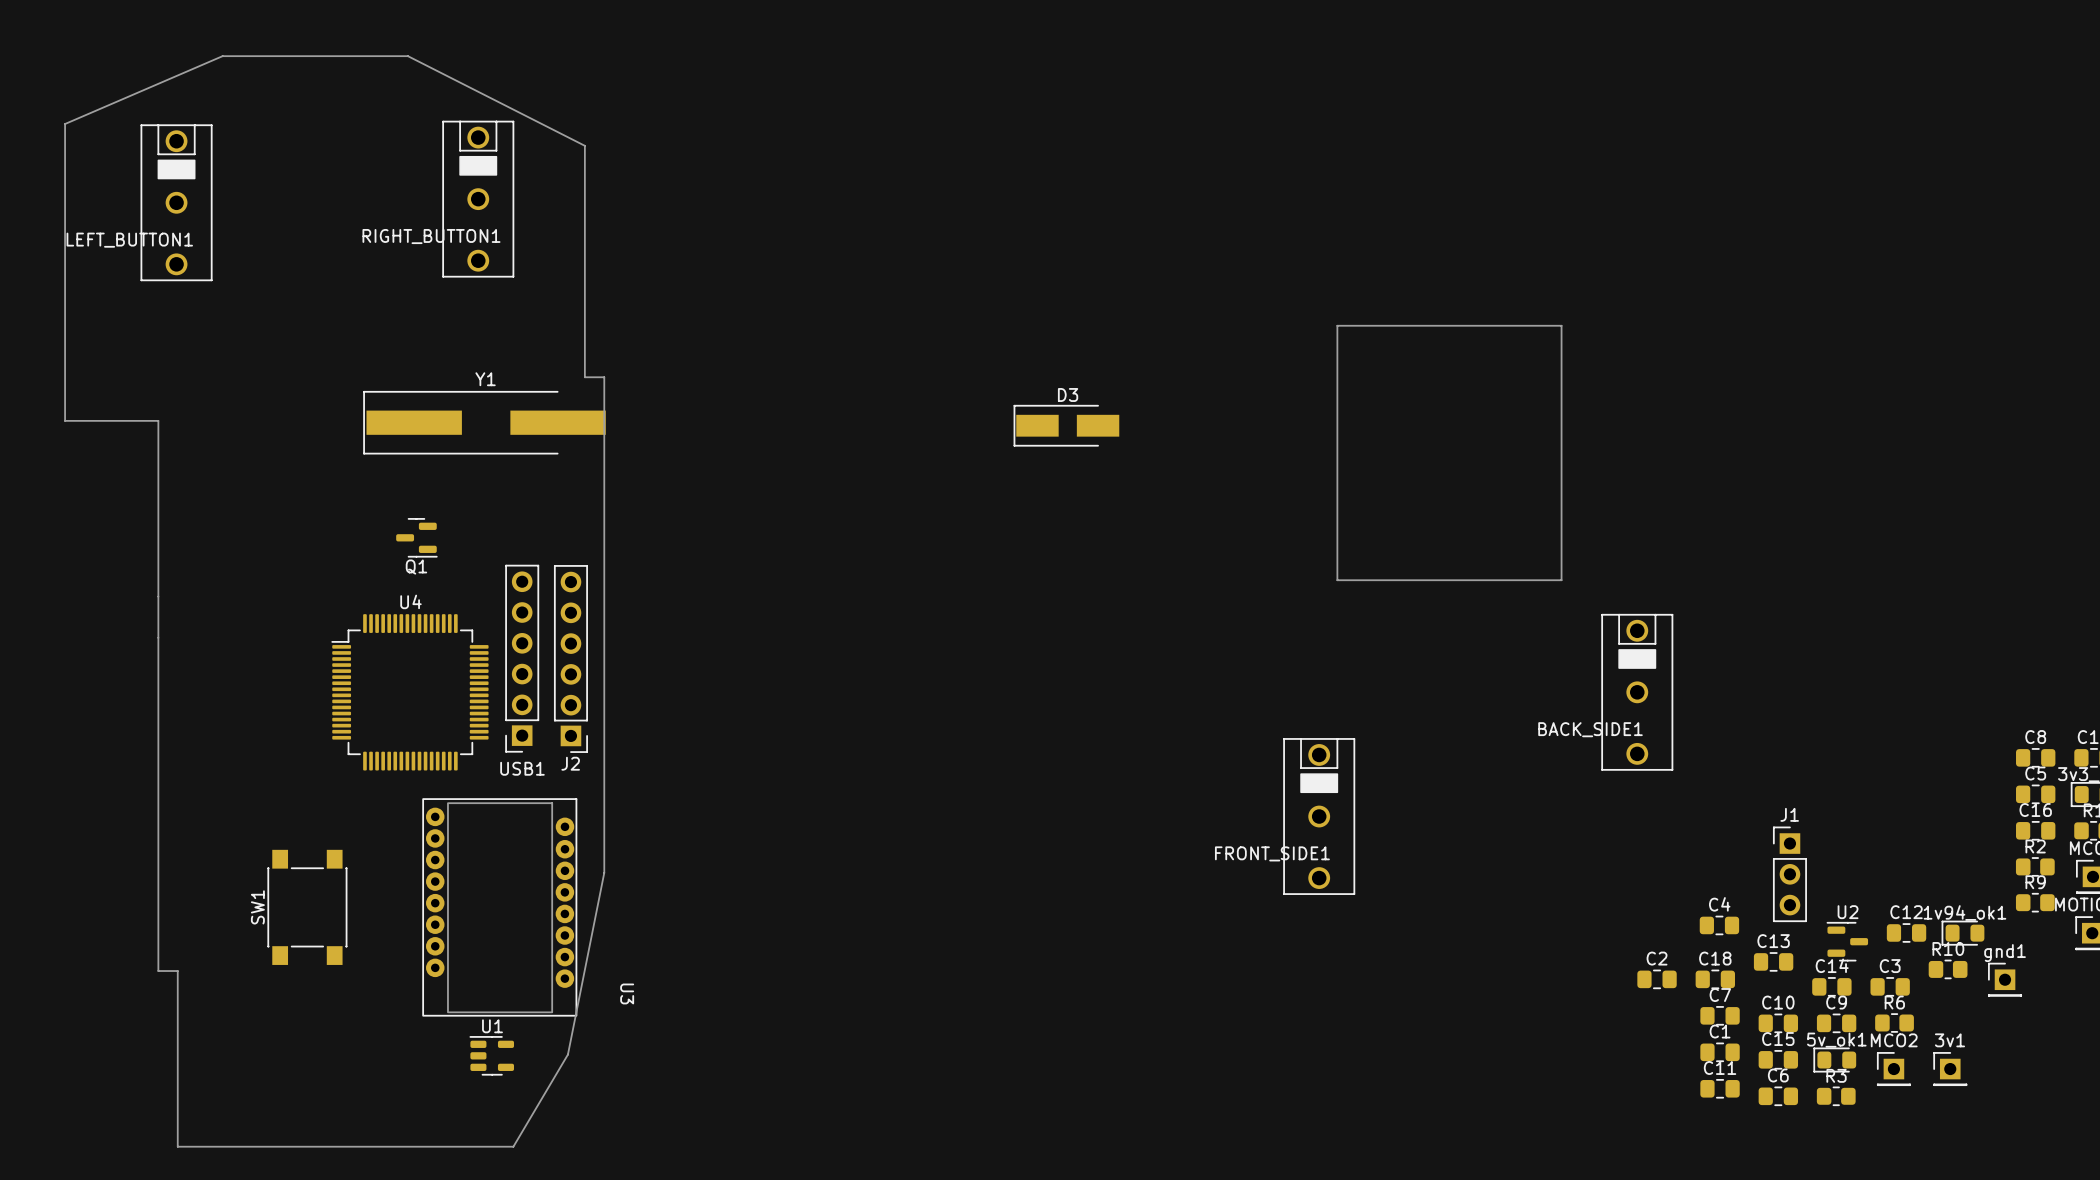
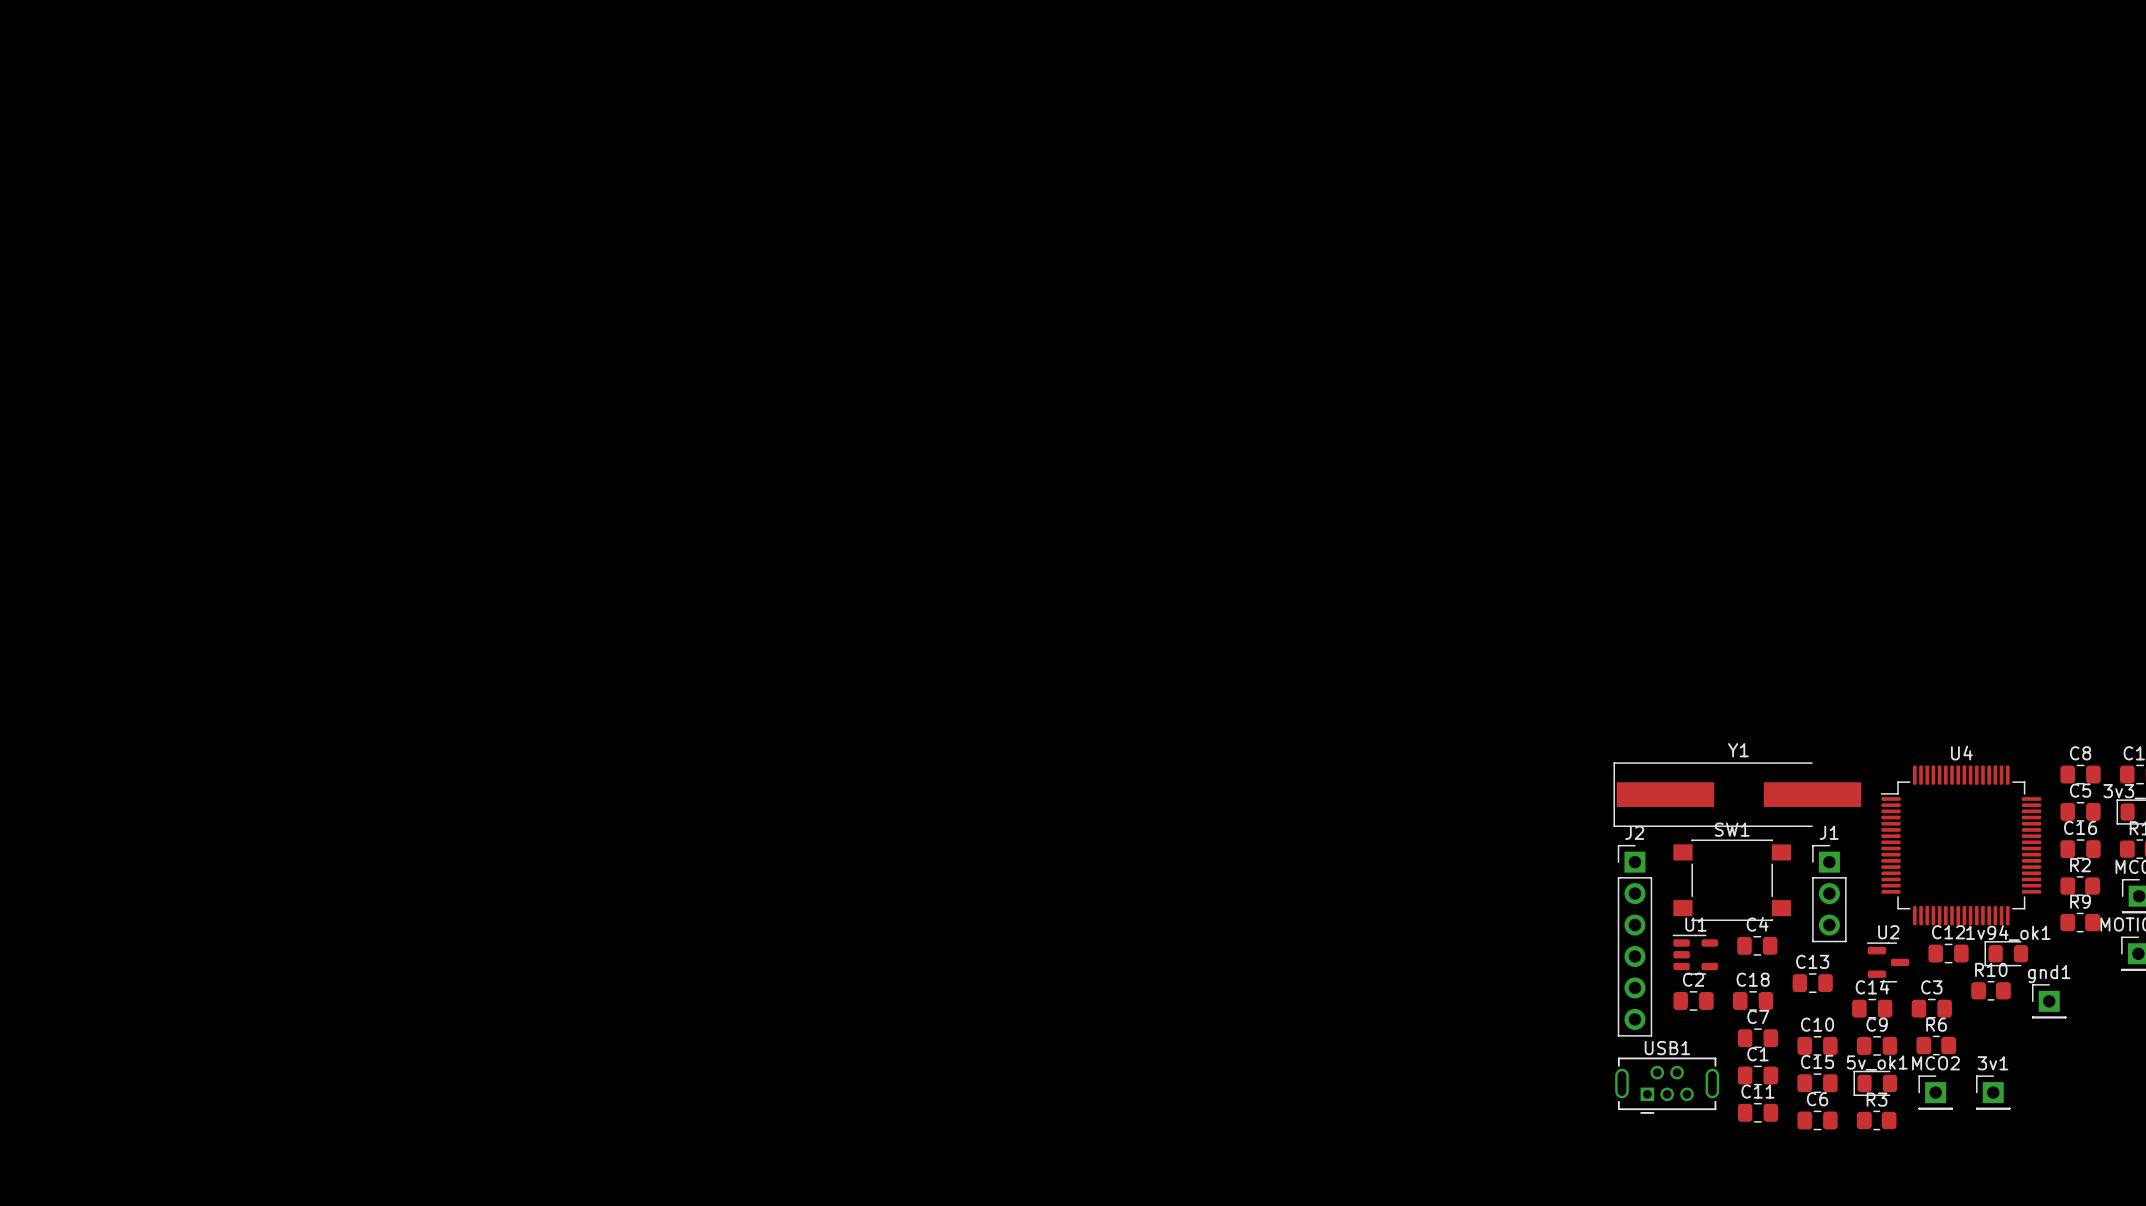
board edge: (222, 56) (65, 124) (65, 420) (158, 420) (158, 971) (177, 971) (177, 1146) (513, 1146) (567, 1054) (604, 872) (604, 377) (584, 377) (584, 145) (407, 56) (222, 56) -> none
RIGHT_BUTTON1: (478, 199) -> none
LEFT_BUTTON1: (176, 202) -> none
board edge: (1337, 325) (1561, 325) (1561, 580) (1337, 580) (1337, 325) -> none
Y1 position: (484, 422) -> (1737, 794)
D3: (1066, 425) -> none
Q1: (416, 537) -> none
USB1 footprint: [505, 564, 540, 753] -> [1615, 1057, 1720, 1114]
J2 rotation: 0° (570, 658) -> 180° (1634, 940)
J2 position: (570, 658) -> (1634, 940)
U4 position: (410, 692) -> (1960, 845)
BACK_SIDE1: (1637, 692) -> none
USB1 name position: USB1 (522, 768) -> USB1 (1667, 1048)
FRONT_SIDE1: (1319, 816) -> none
SW1 rotation: 0° (307, 907) -> 90° clockwise (1732, 880)
SW1 position: (307, 907) -> (1732, 880)
U3: (499, 907) -> none
U1 position: (491, 1055) -> (1695, 954)

